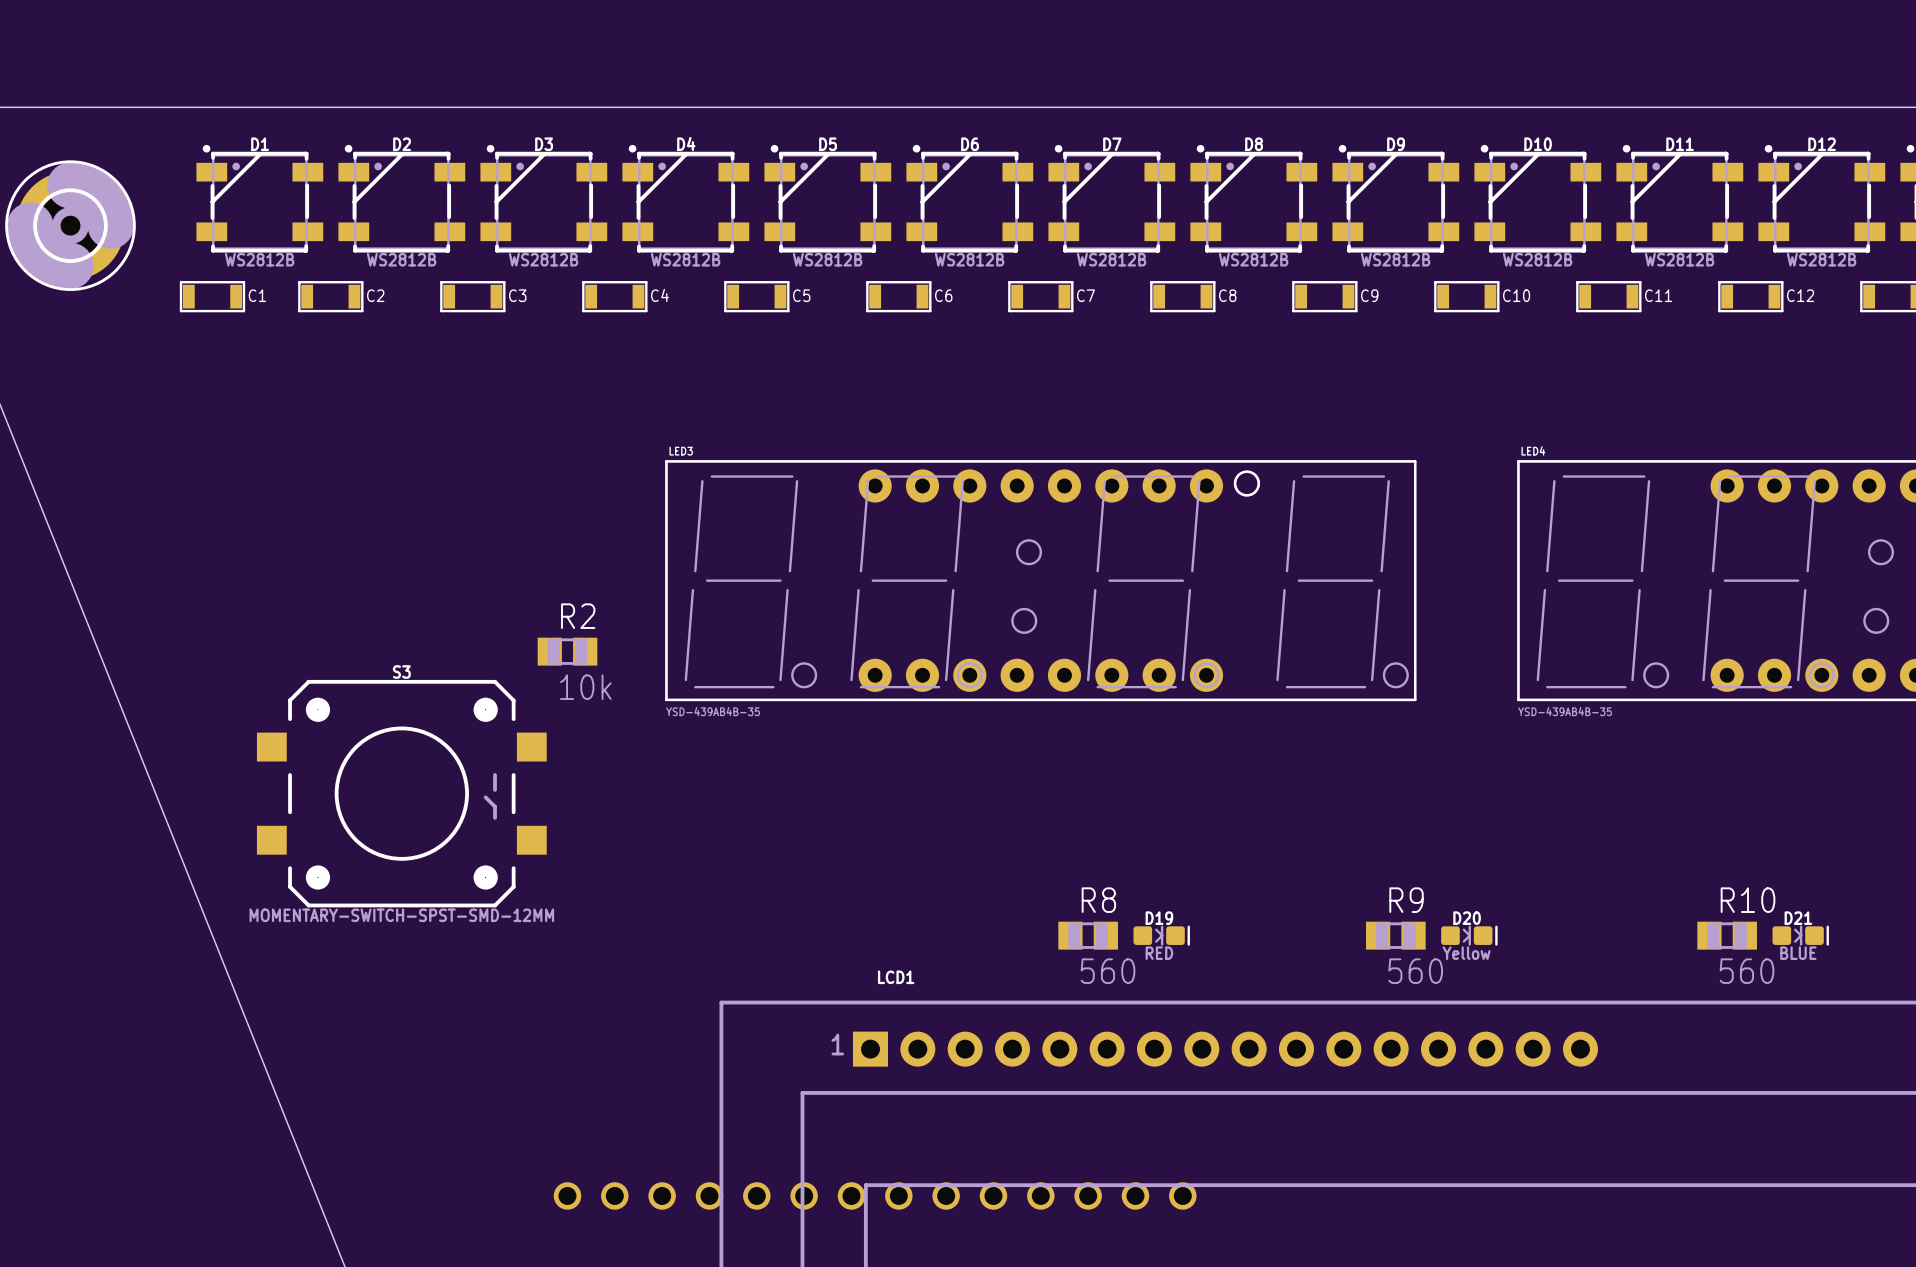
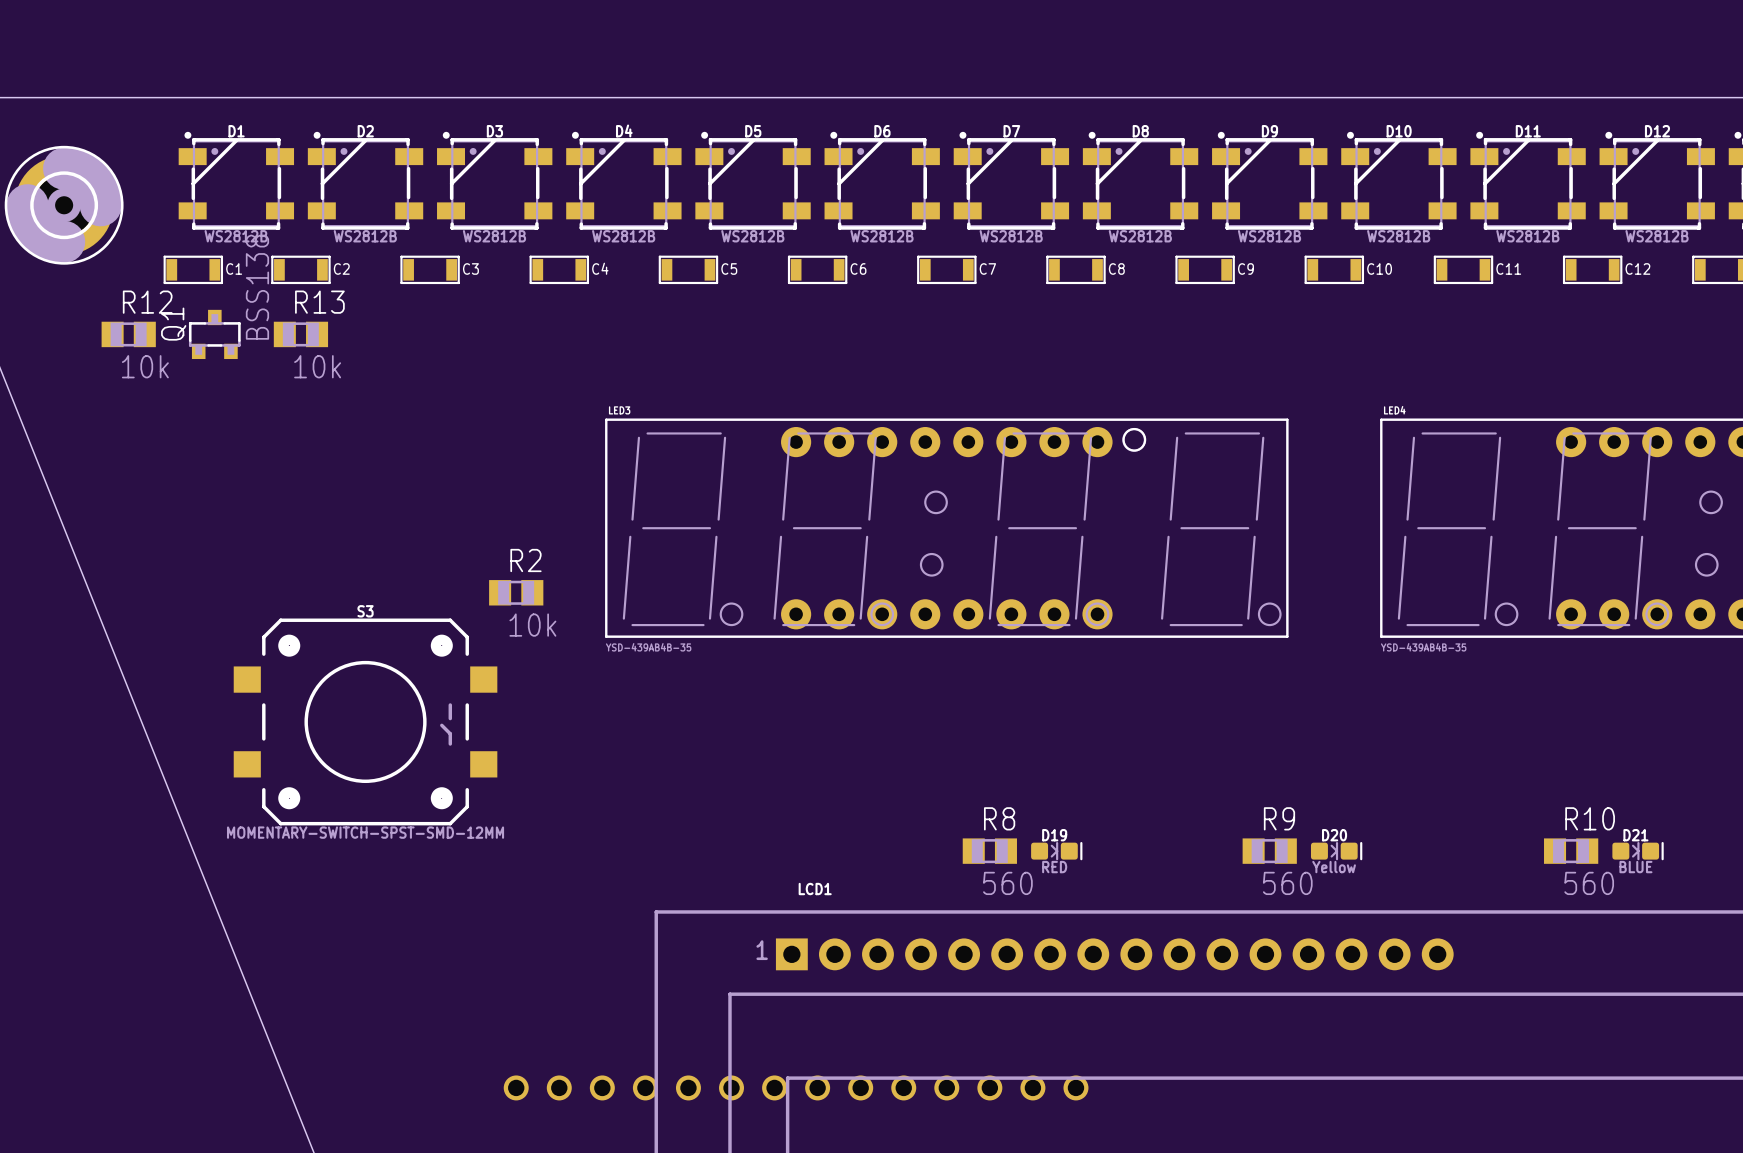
R12: none -> 10k (128, 334)
Q1: none -> BSS138 (214, 334)
R13: none -> 10k (300, 334)

